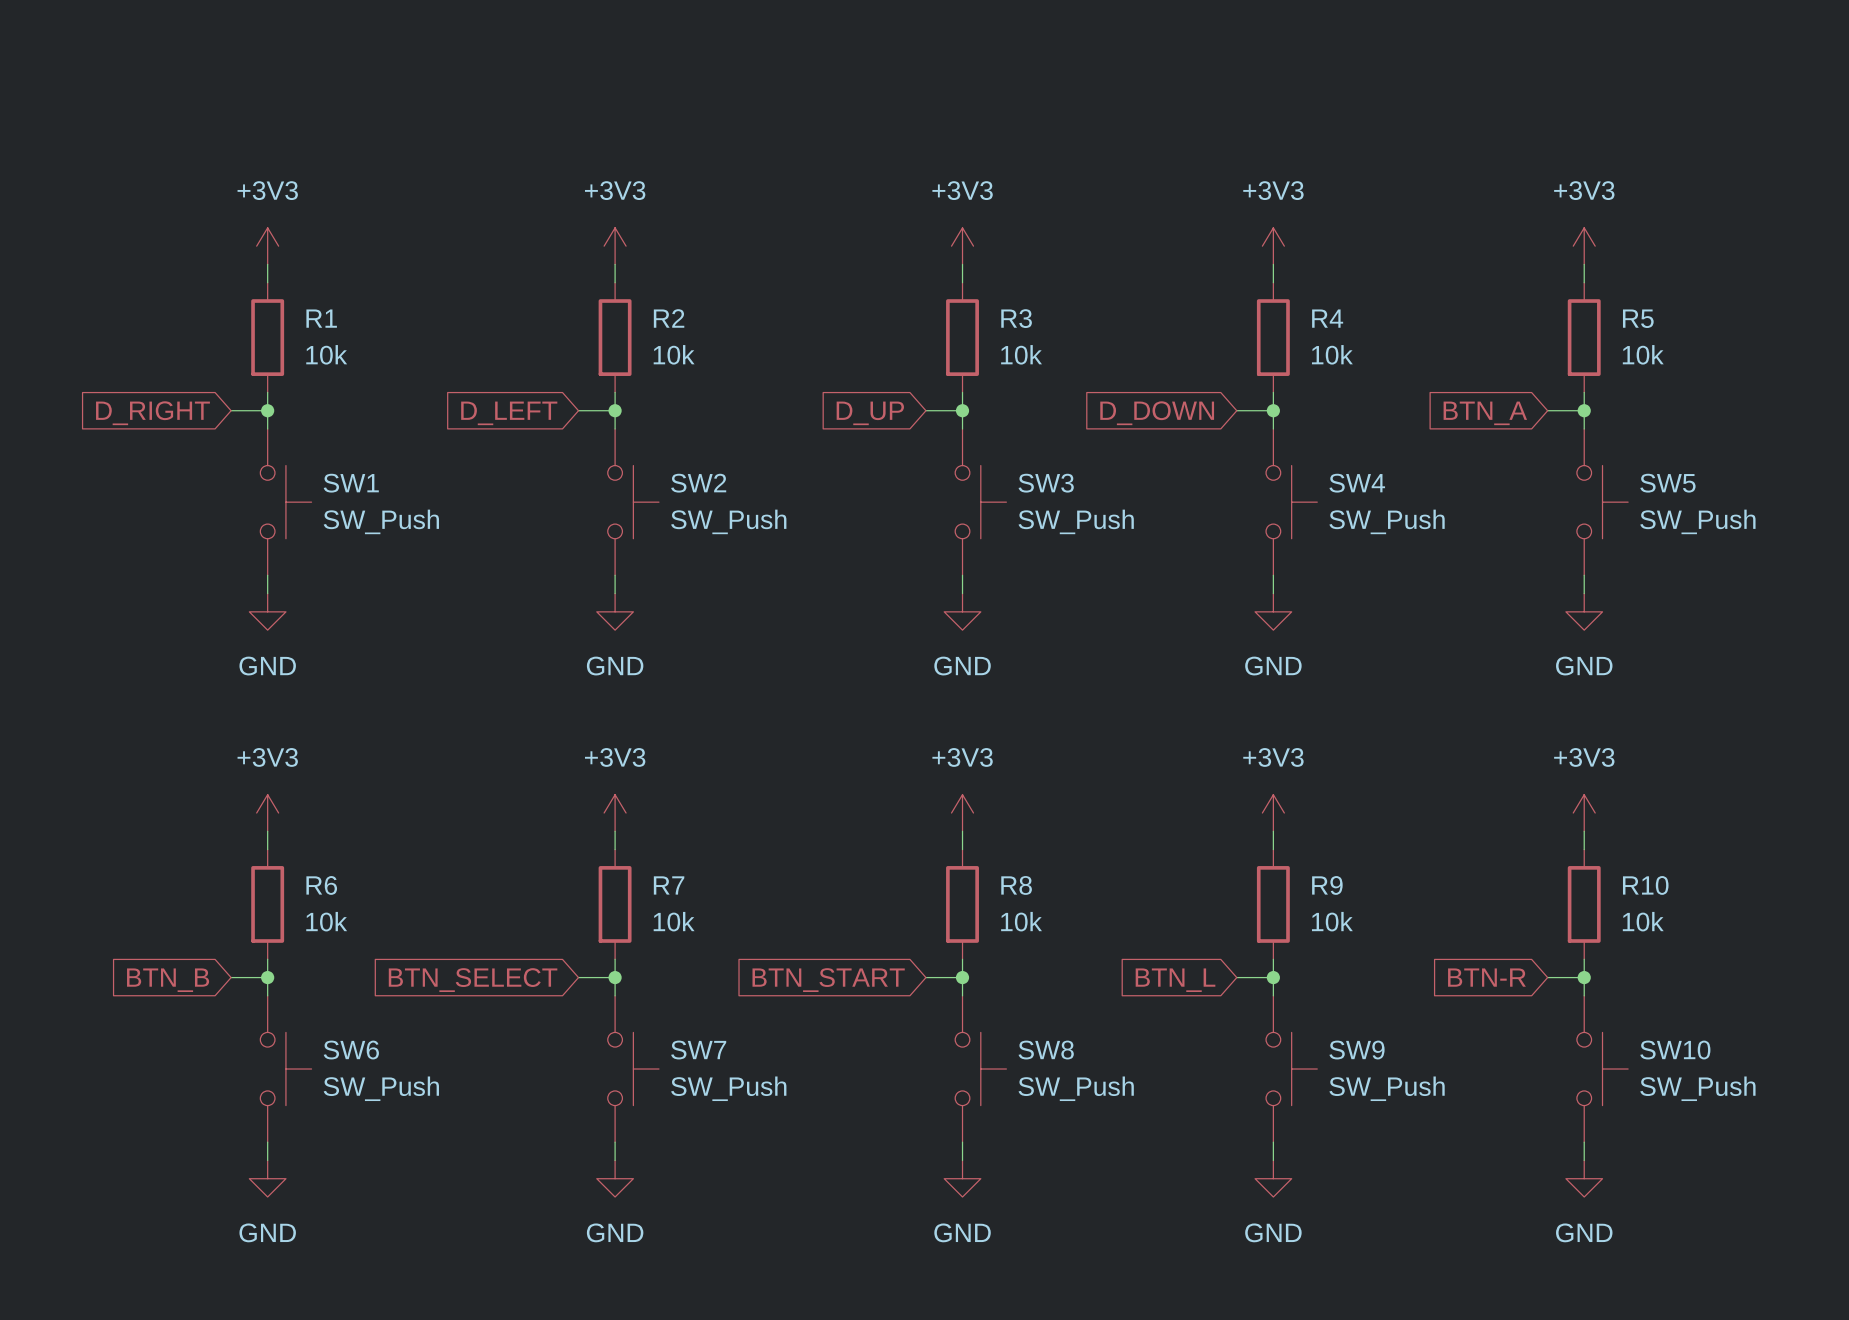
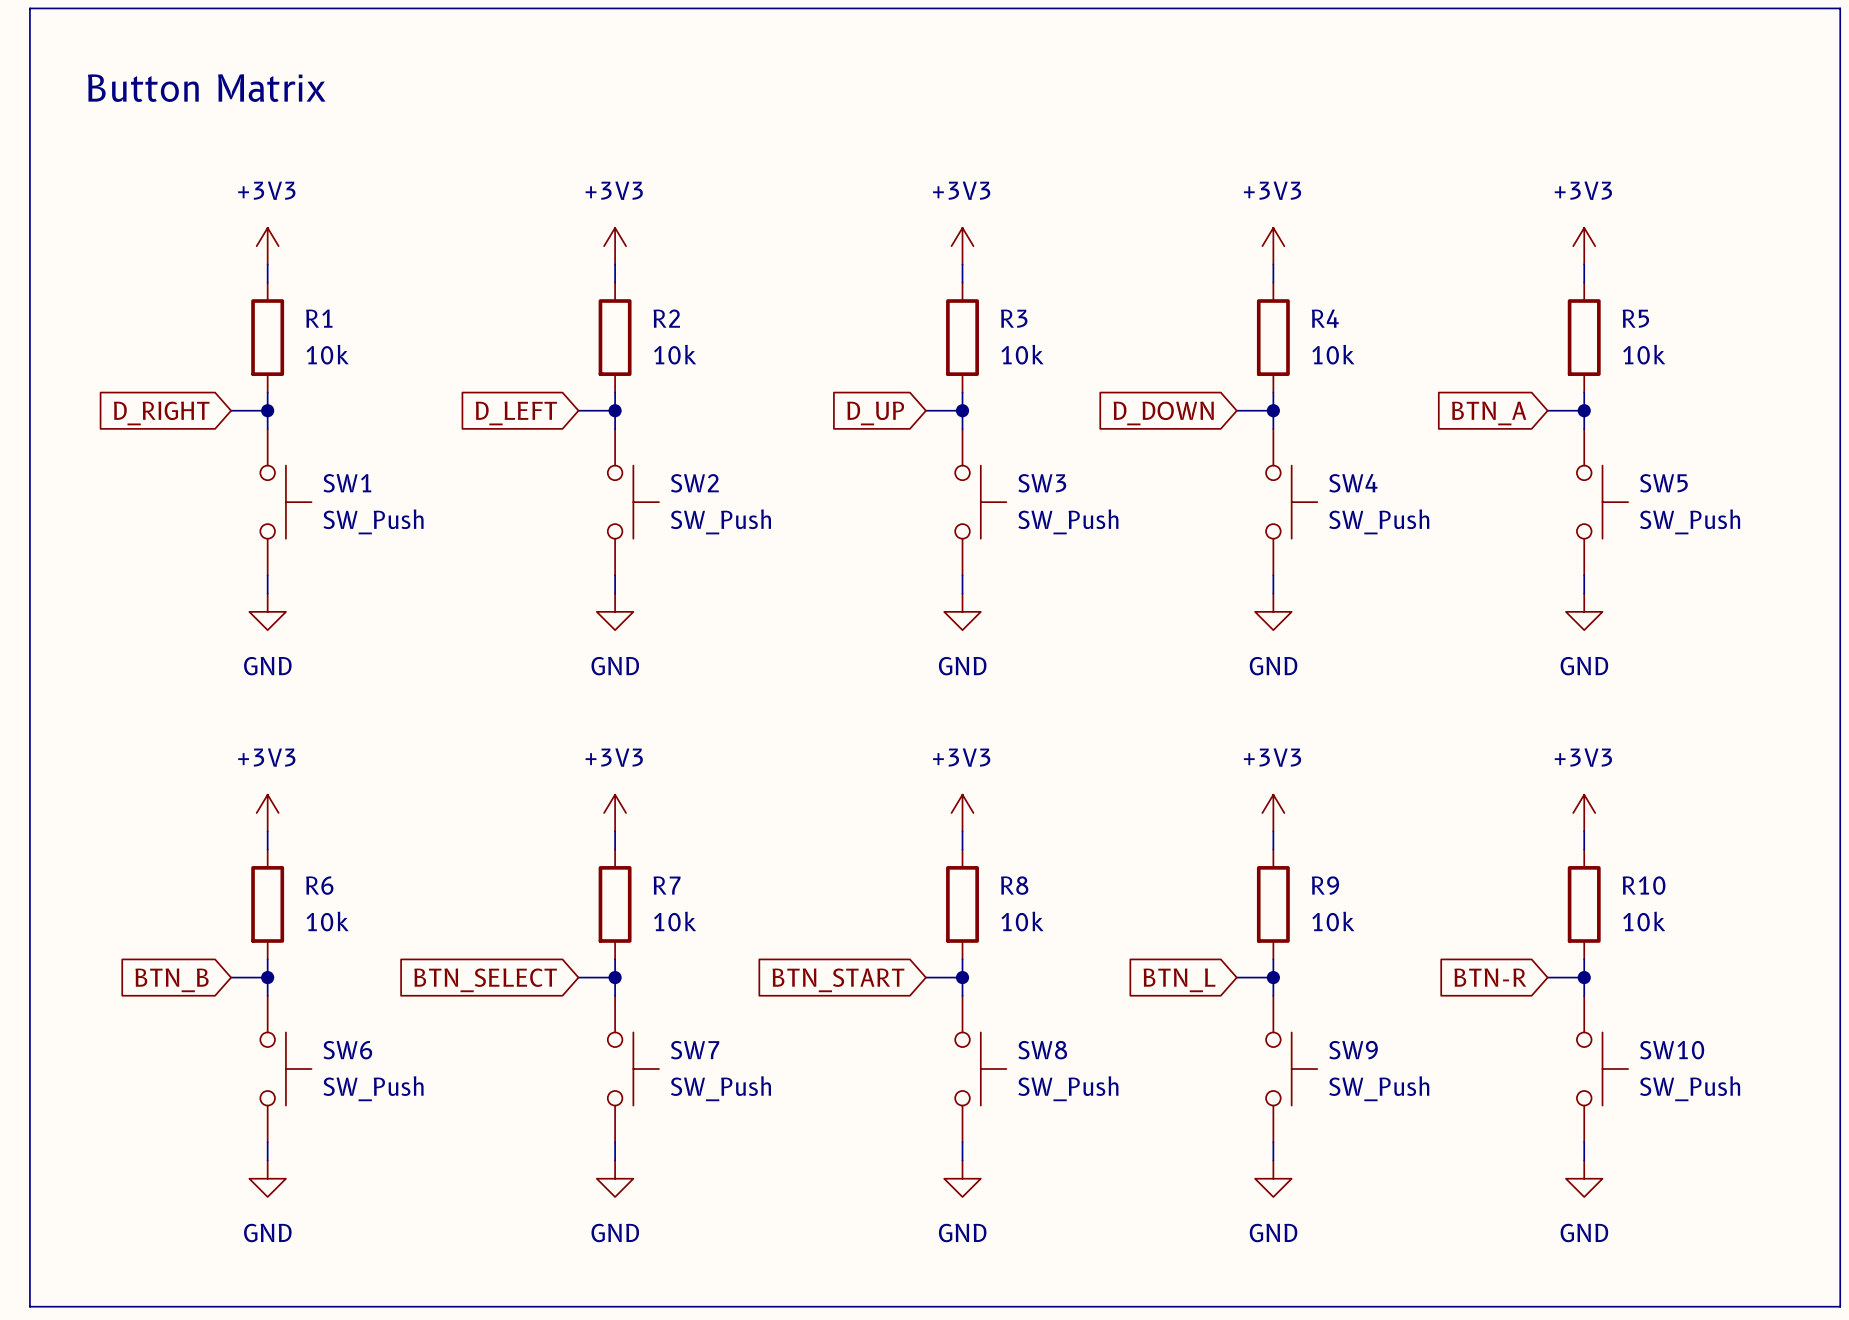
line: none -> (29, 8) (1840, 8) (1840, 1306) (29, 1306) (29, 8)
text: none -> Button Matrix (206, 88)

